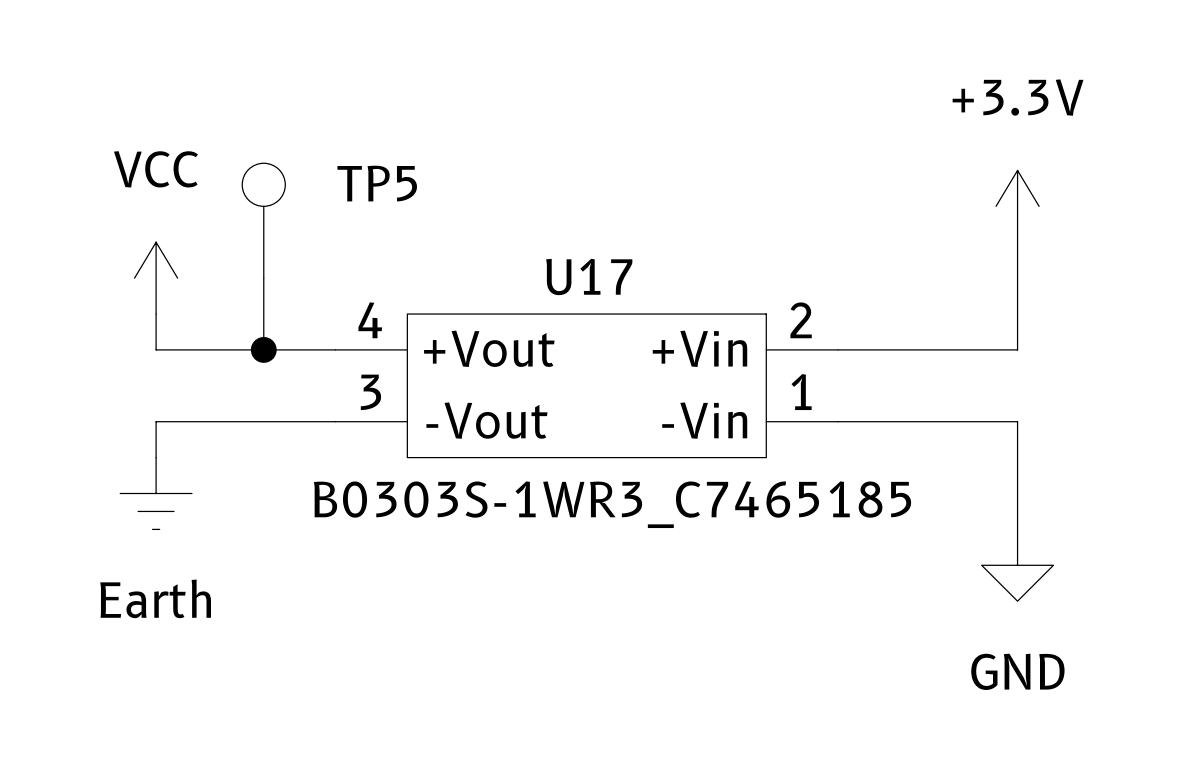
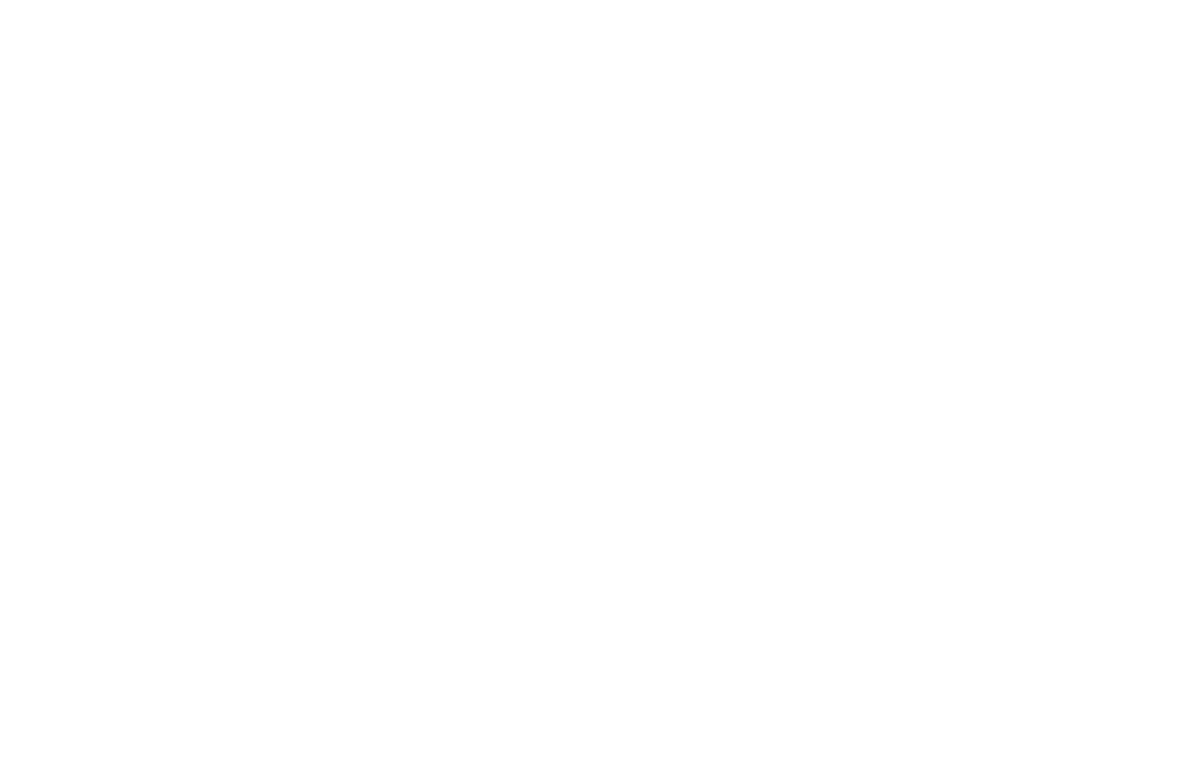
power symbol: +3.3V (1017, 206) -> none
TP5: (263, 220) -> none
wire: (1017, 242) (1017, 349) (838, 349) -> none
power symbol: VCC (156, 278) -> none
wire: (263, 278) (263, 349) -> none
wire: (156, 314) (156, 349) (335, 349) -> none
junction: (263, 349) -> none
U17: B0303S-1WR3_C7465185 (586, 385) -> none
wire: (335, 421) (156, 421) (156, 457) -> none
wire: (838, 421) (1017, 421) (1017, 529) -> none
power symbol: Earth (156, 493) -> none
power symbol: GND (1017, 565) -> none

